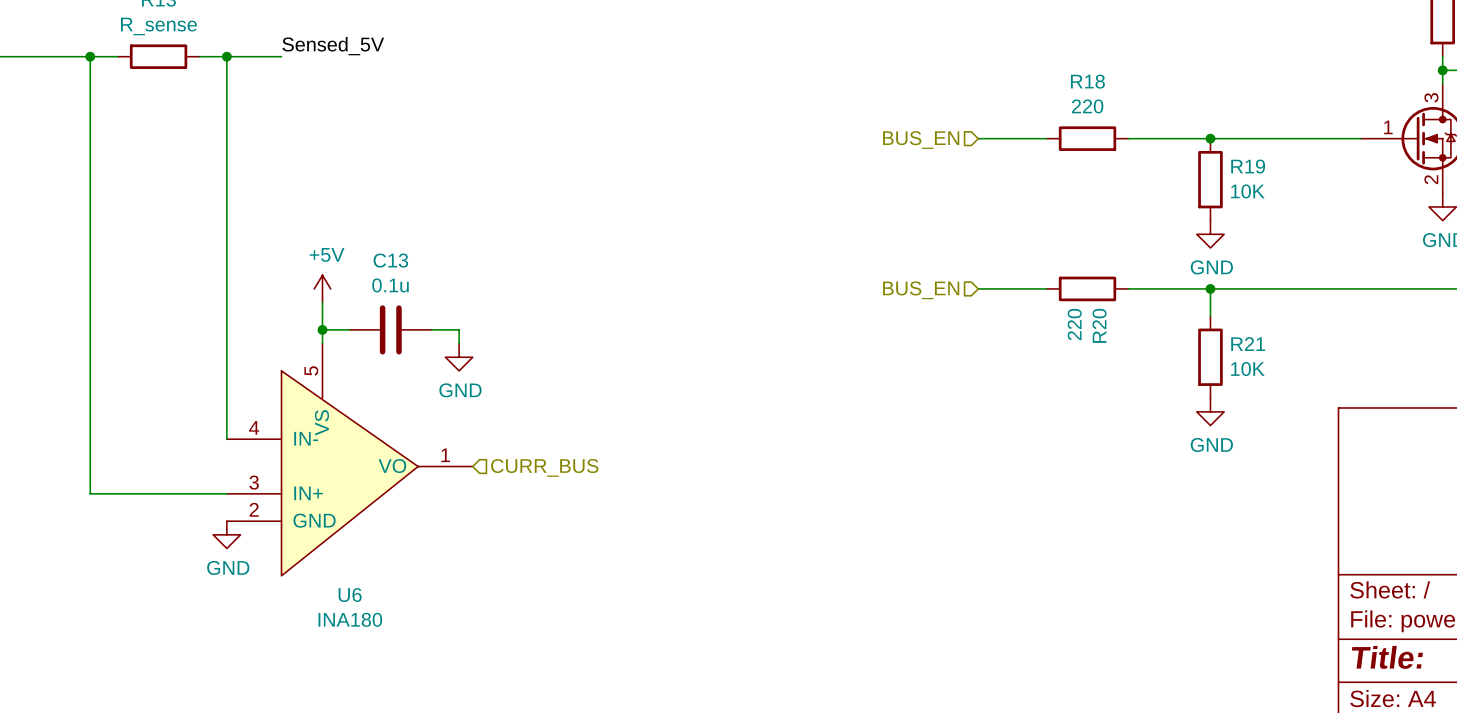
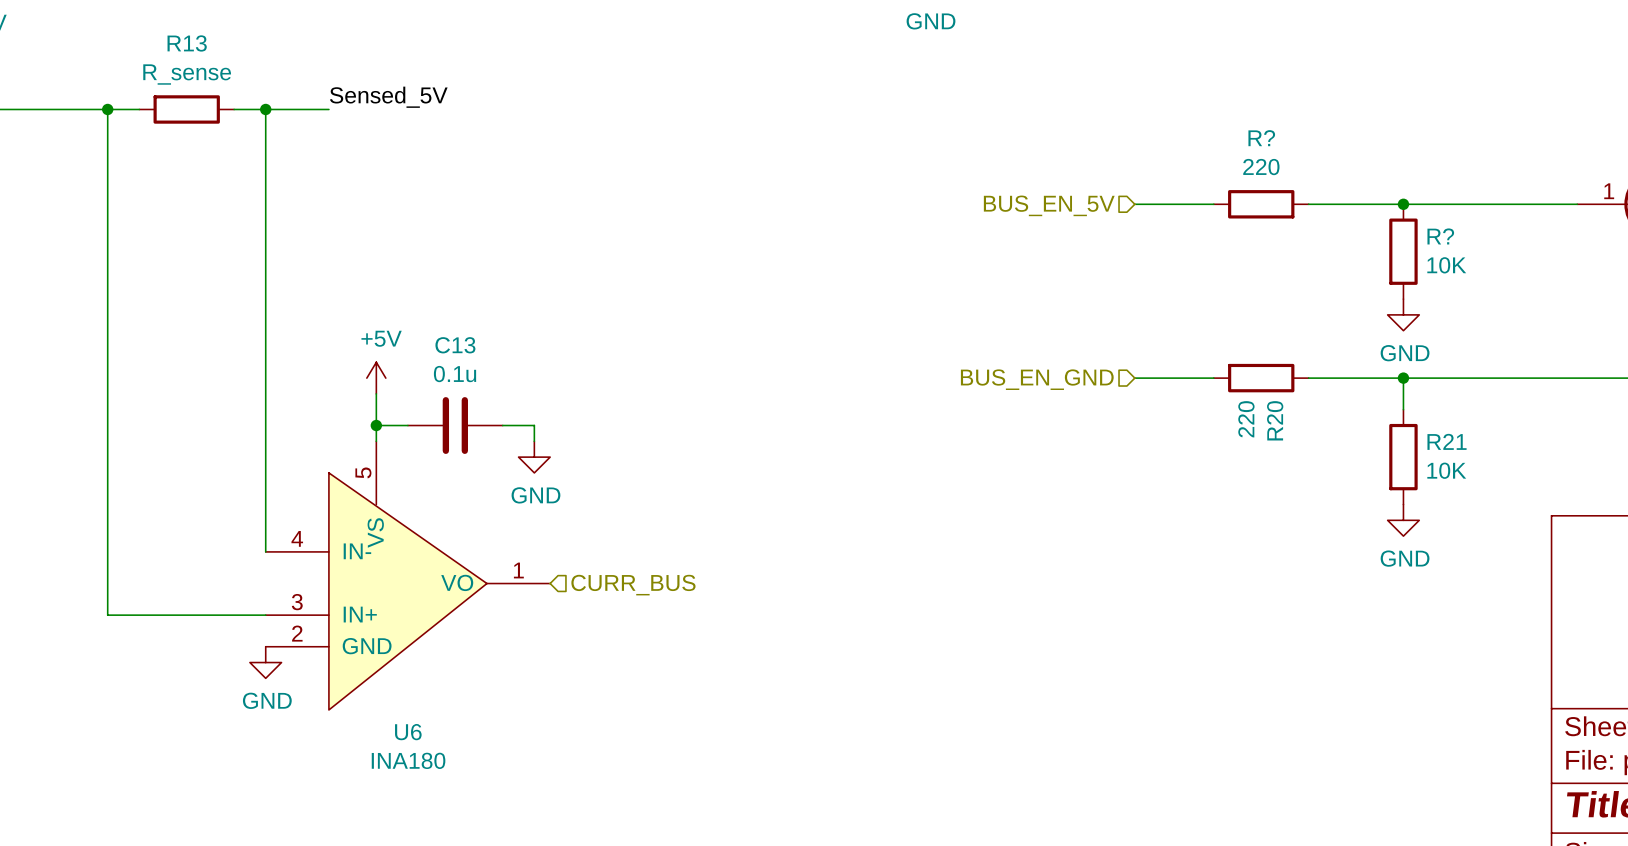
R18 name: R18 (1087, 81) -> R? (1261, 138)
hierarchical label: BUS_EN (921, 140) -> BUS_EN_5V (1049, 205)
R19 name: R19 (1248, 166) -> R? (1440, 236)
hierarchical label: BUS_EN (921, 290) -> BUS_EN_GND (1037, 379)

